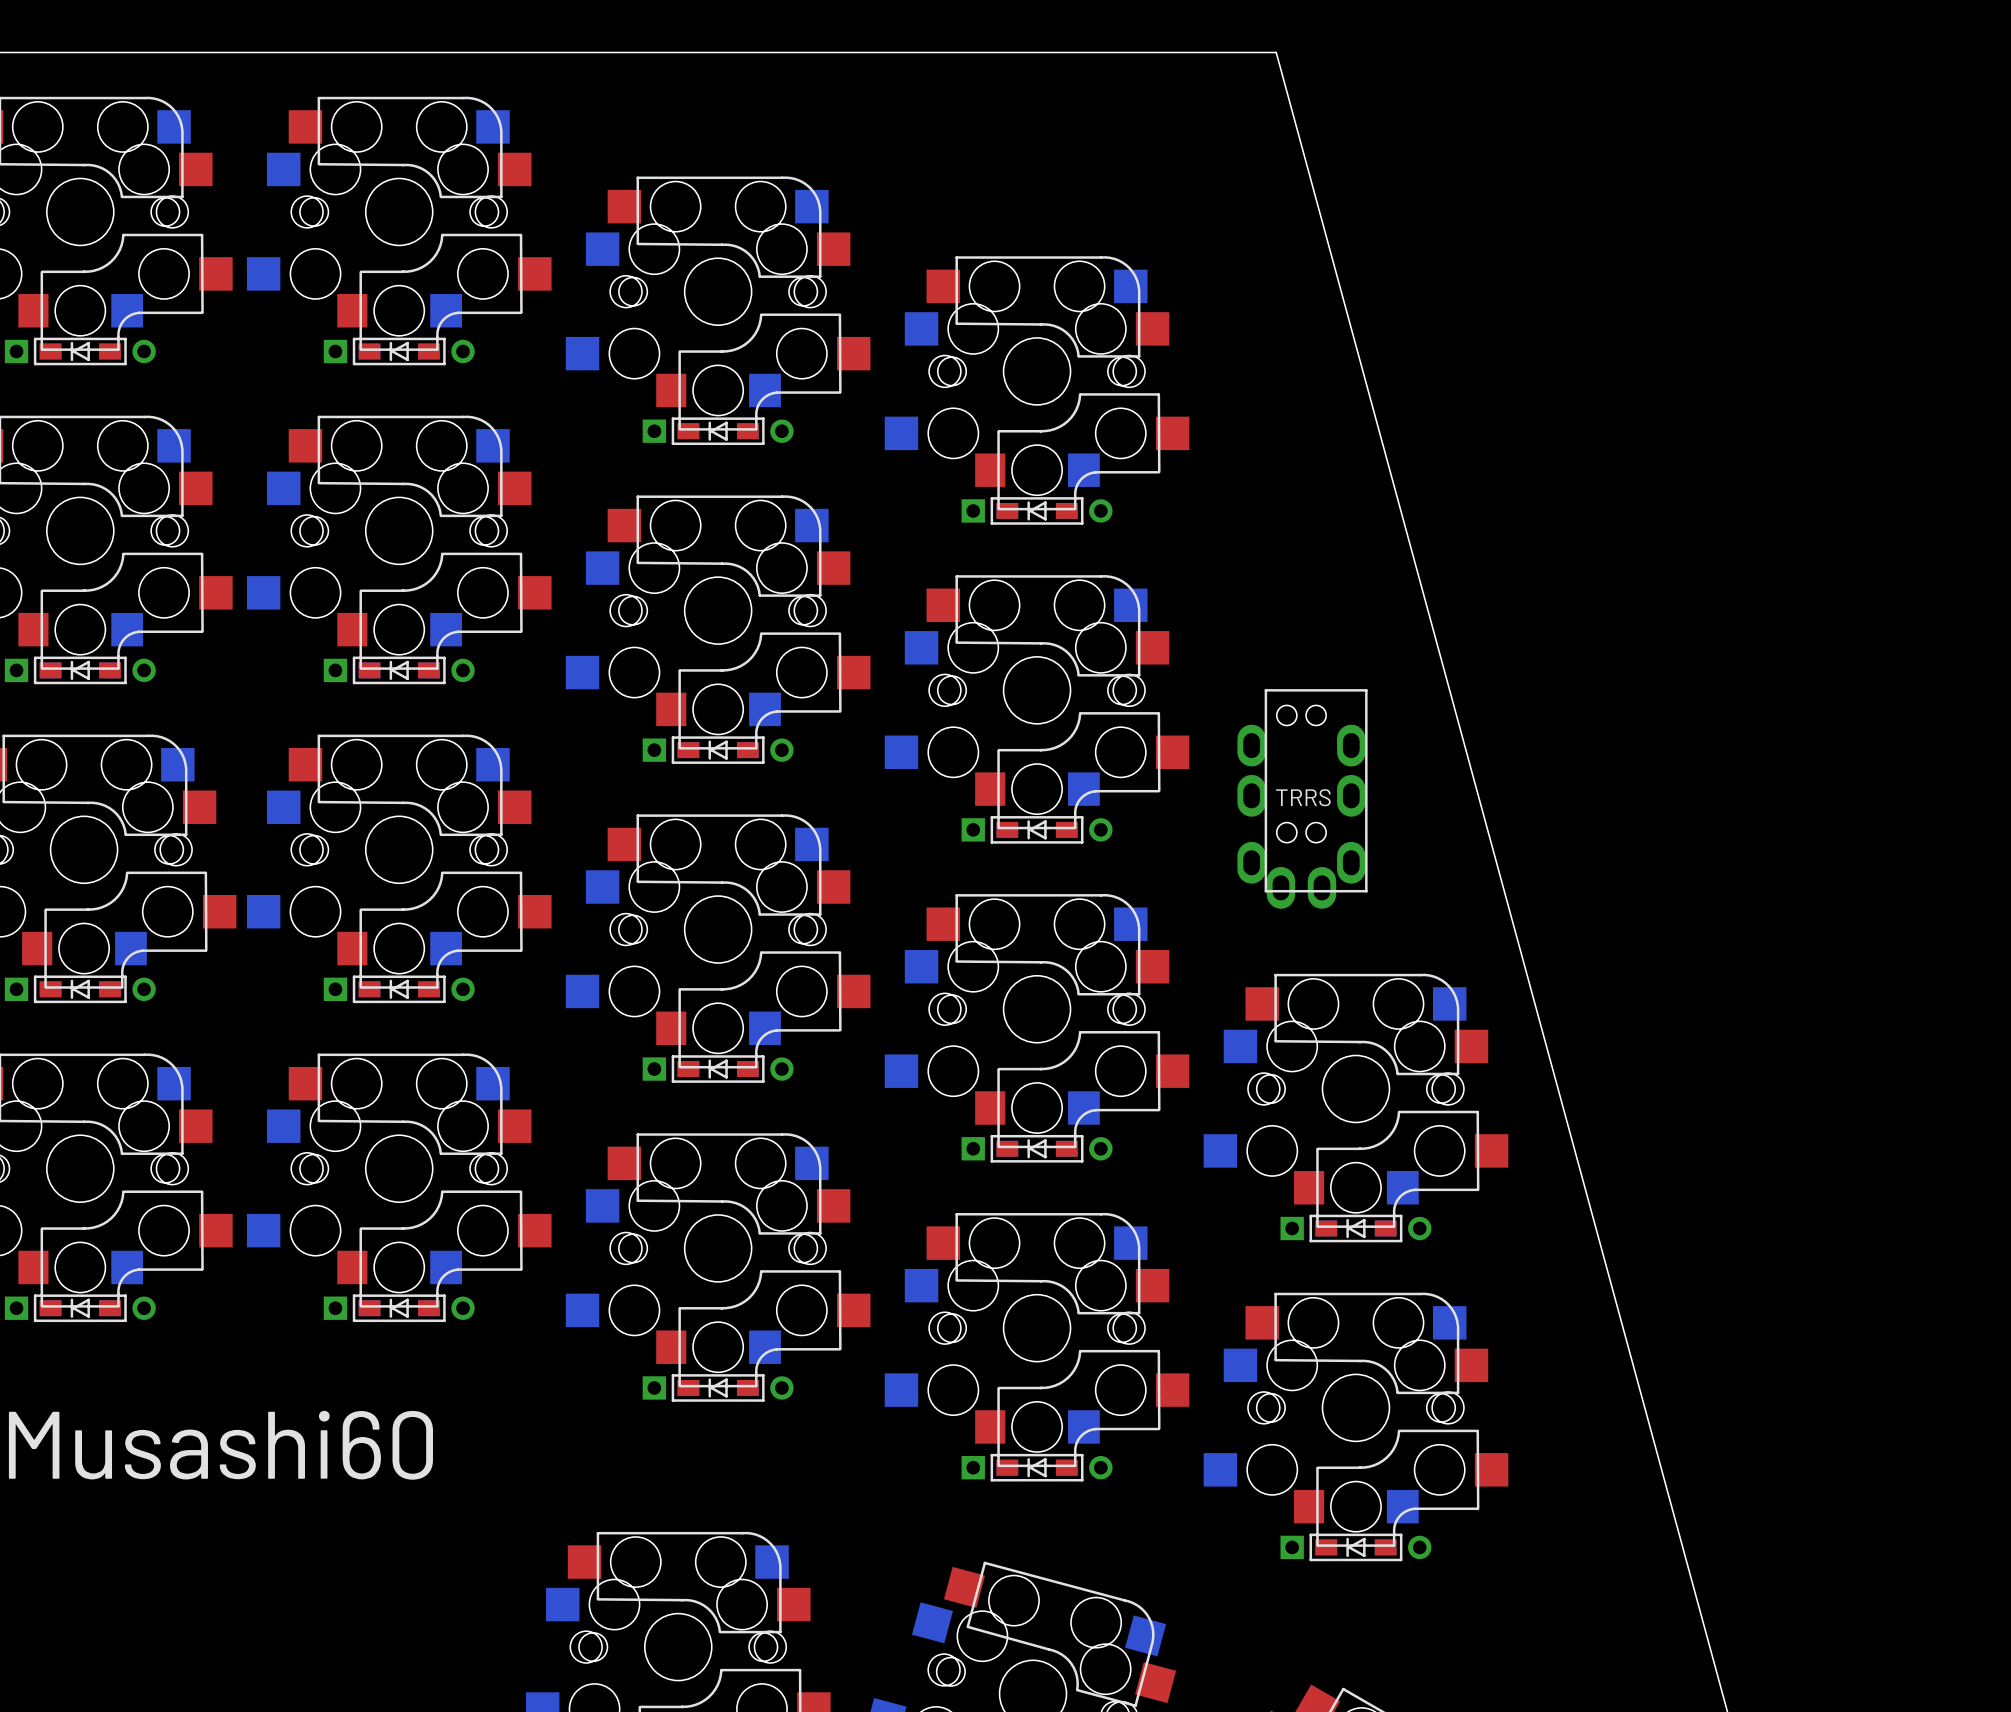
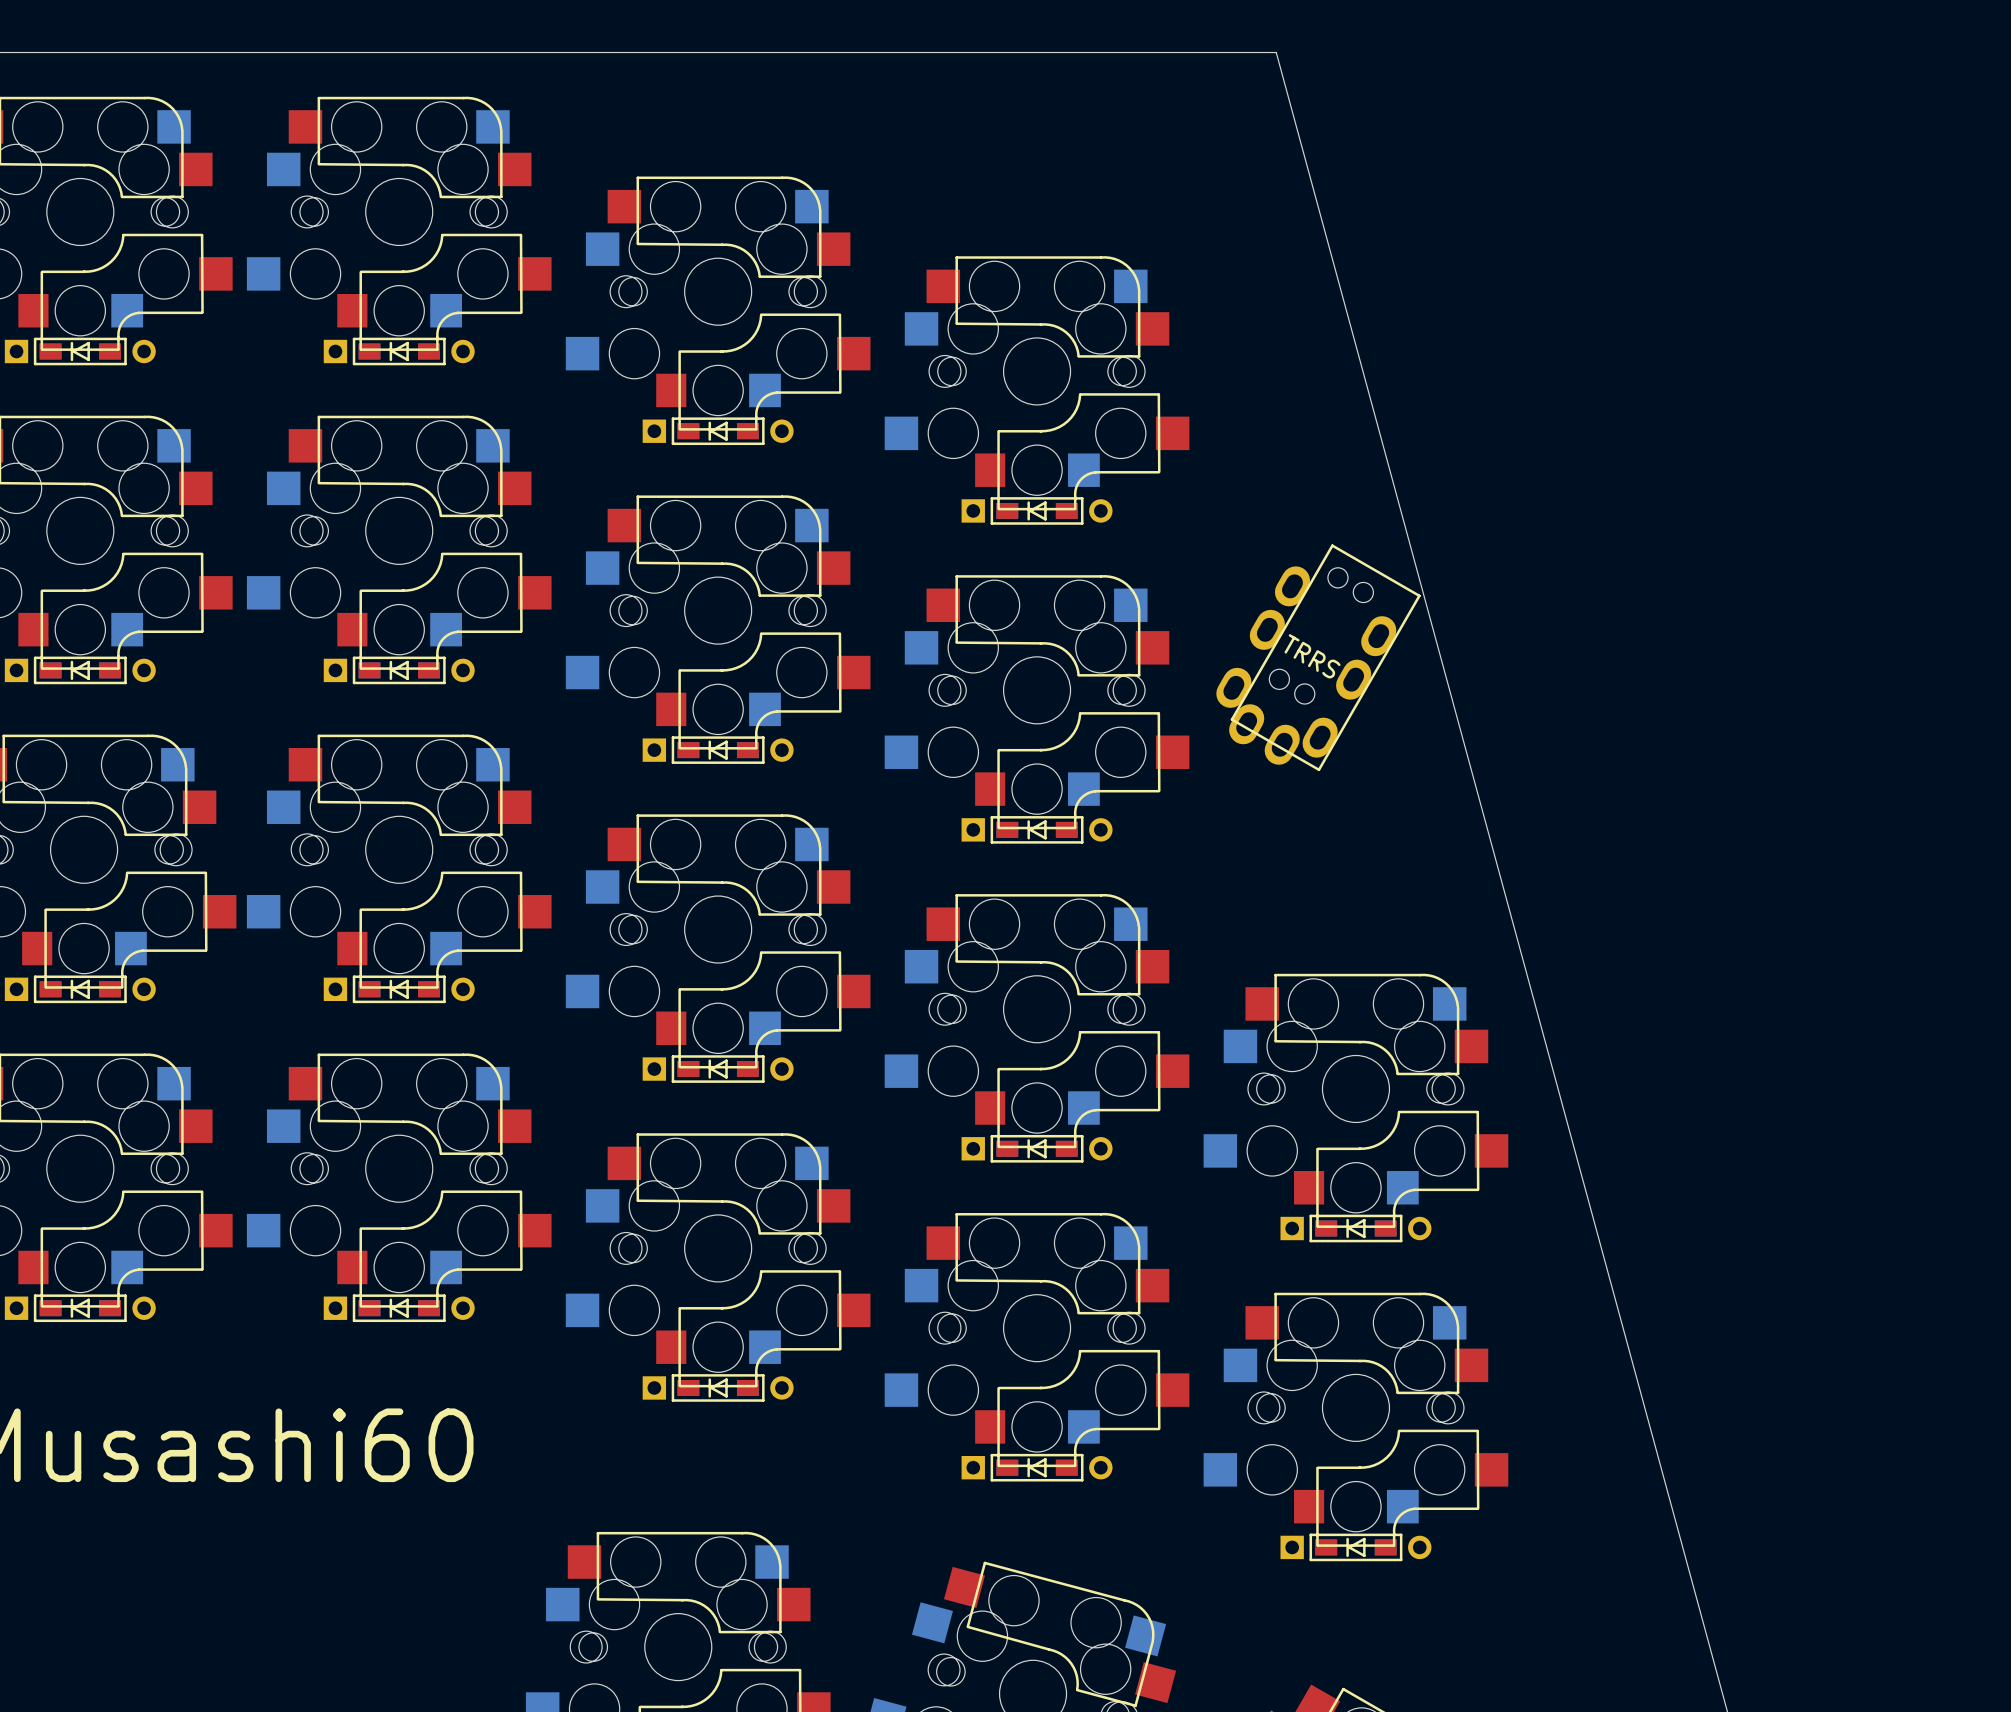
part: none -> (1318, 657)
part: (1302, 798) -> none

